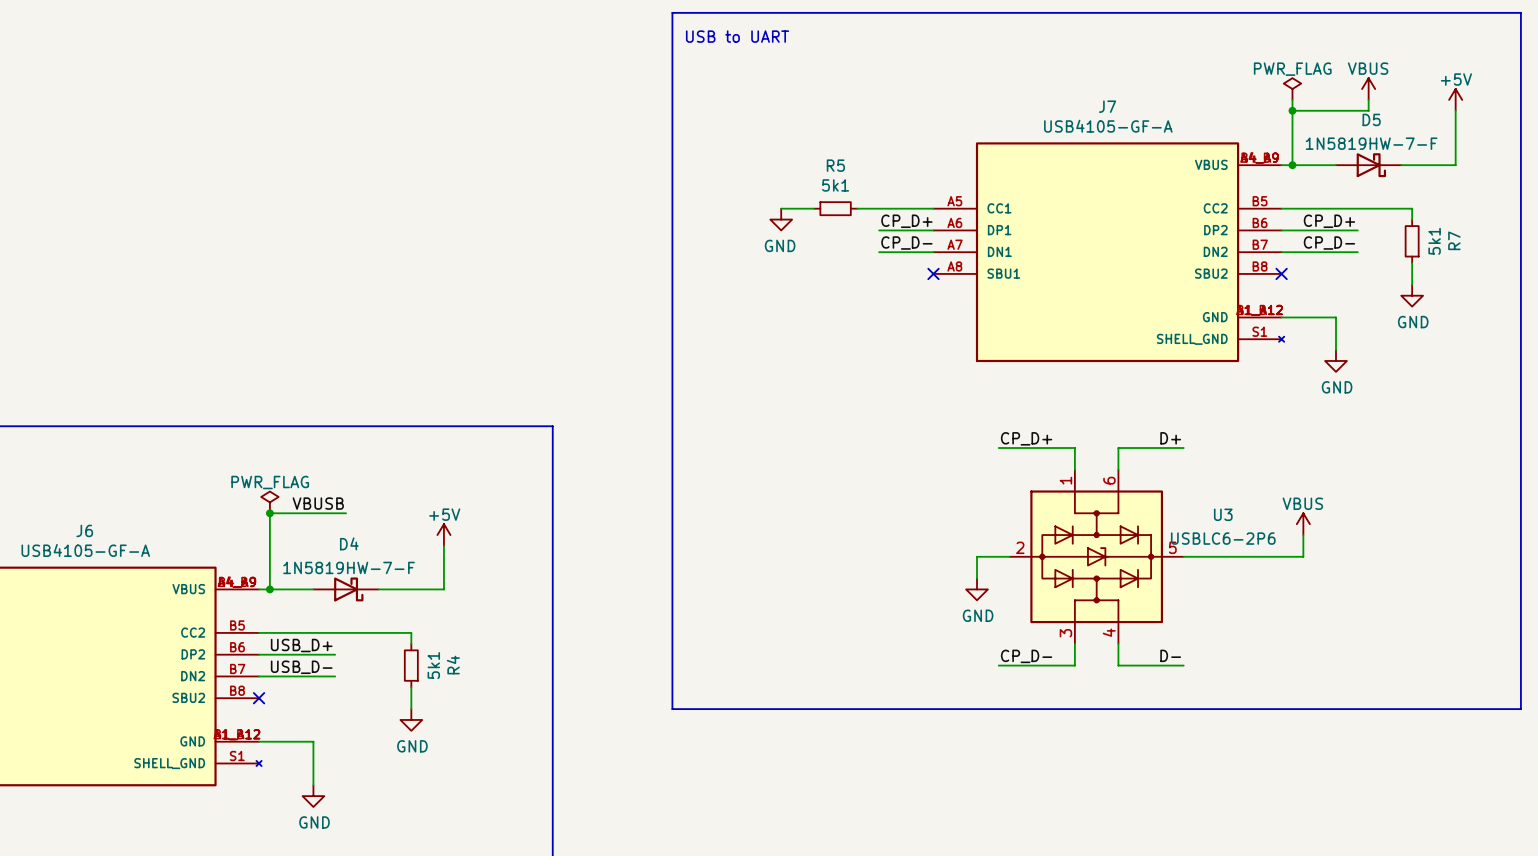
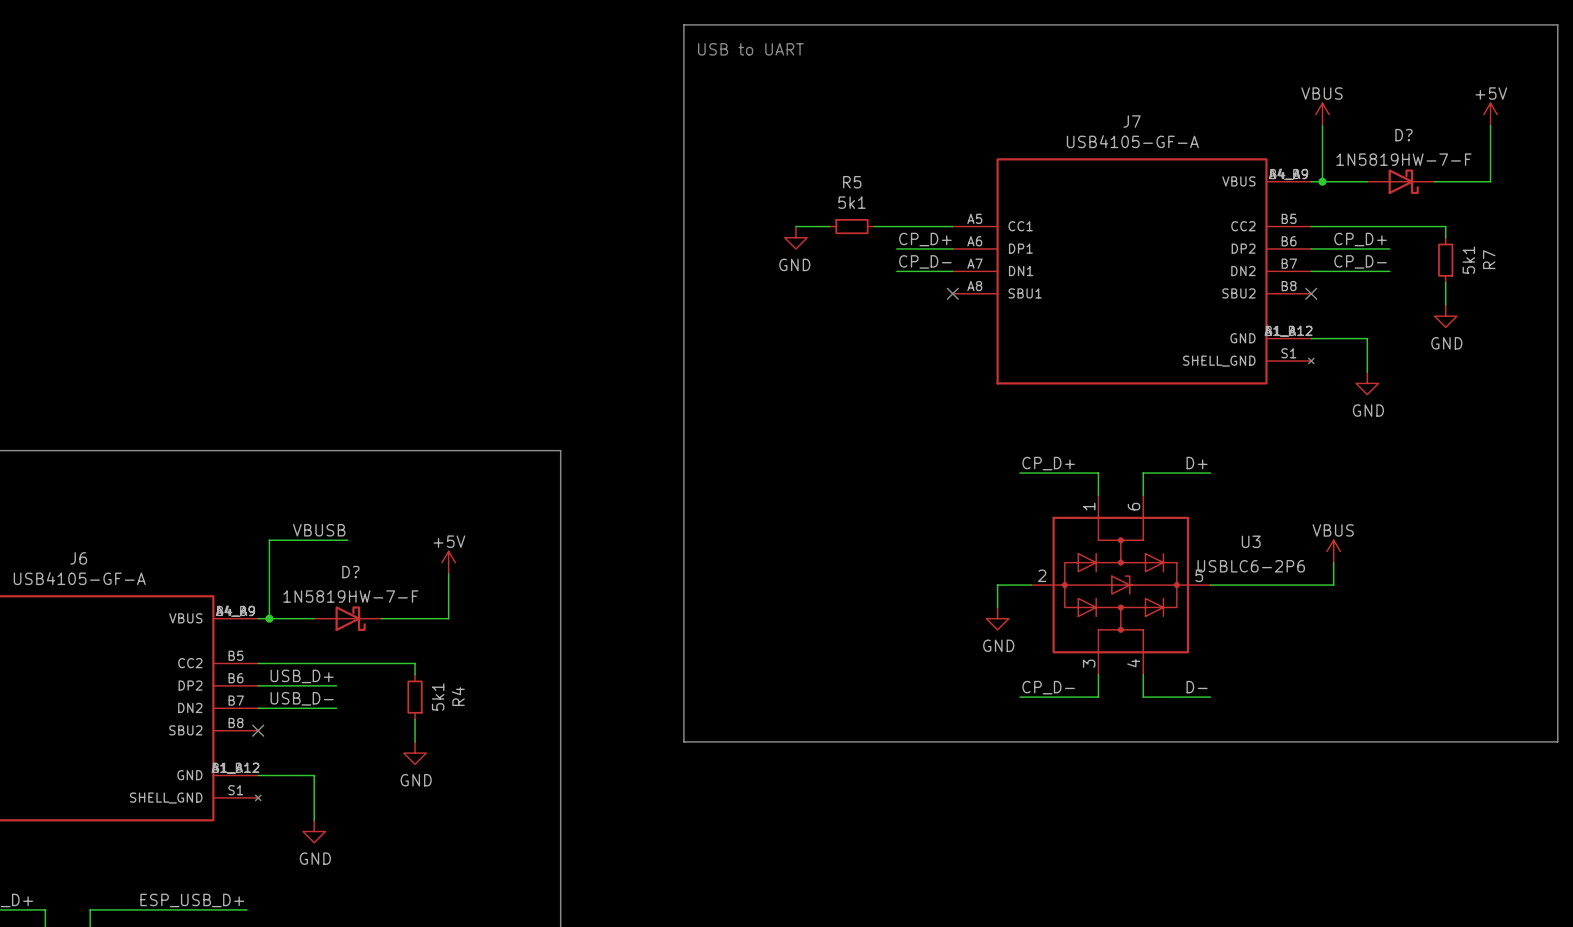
power symbol: PWR_FLAG (1292, 89) -> none
power symbol position: VBUS (1368, 89) -> VBUS (1322, 114)
wire: (1292, 99) (1292, 110) (1368, 110) (1368, 99) -> none
junction: (1292, 110) -> none
D5 name: D5 (1371, 119) -> D? (1403, 135)
power symbol: PWR_FLAG (269, 502) -> none
junction: (269, 513) -> none
D4 name: D4 (349, 543) -> D? (350, 572)

